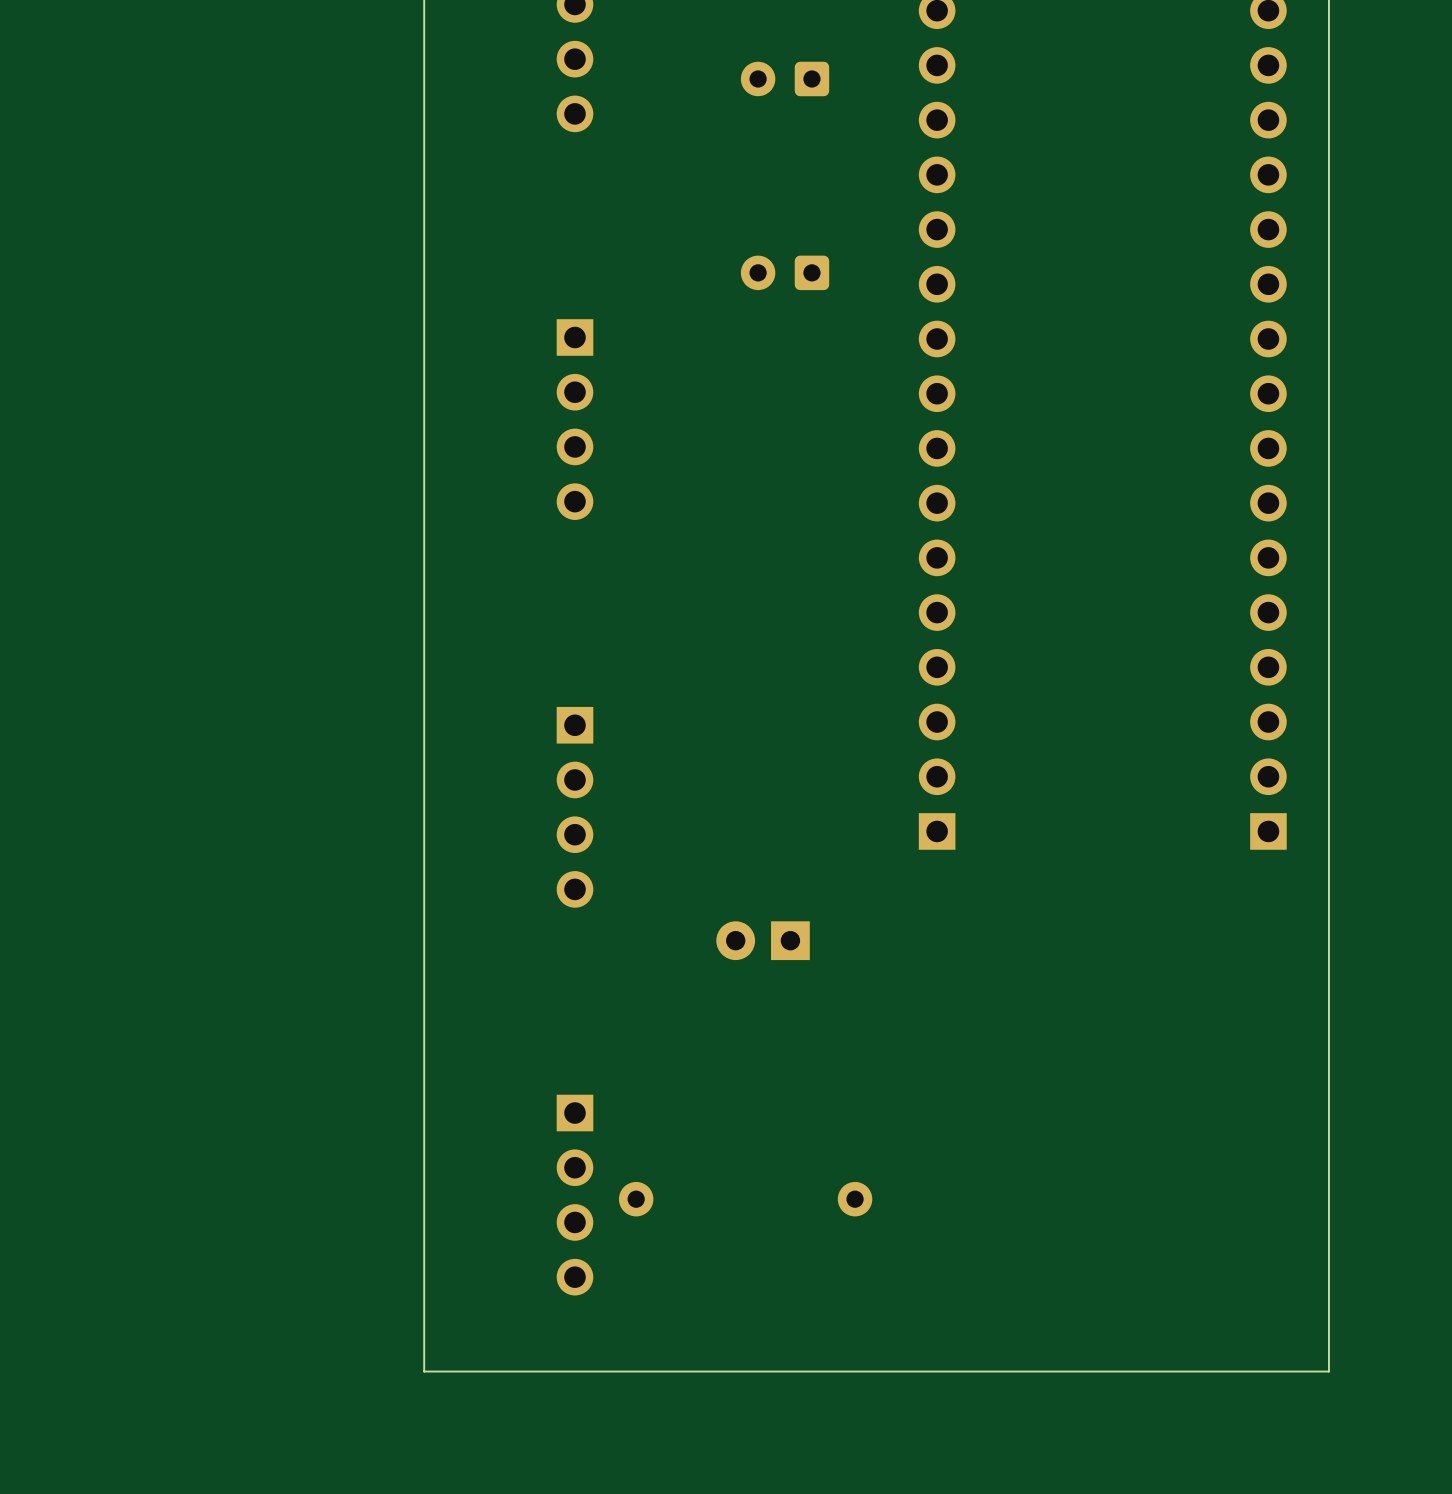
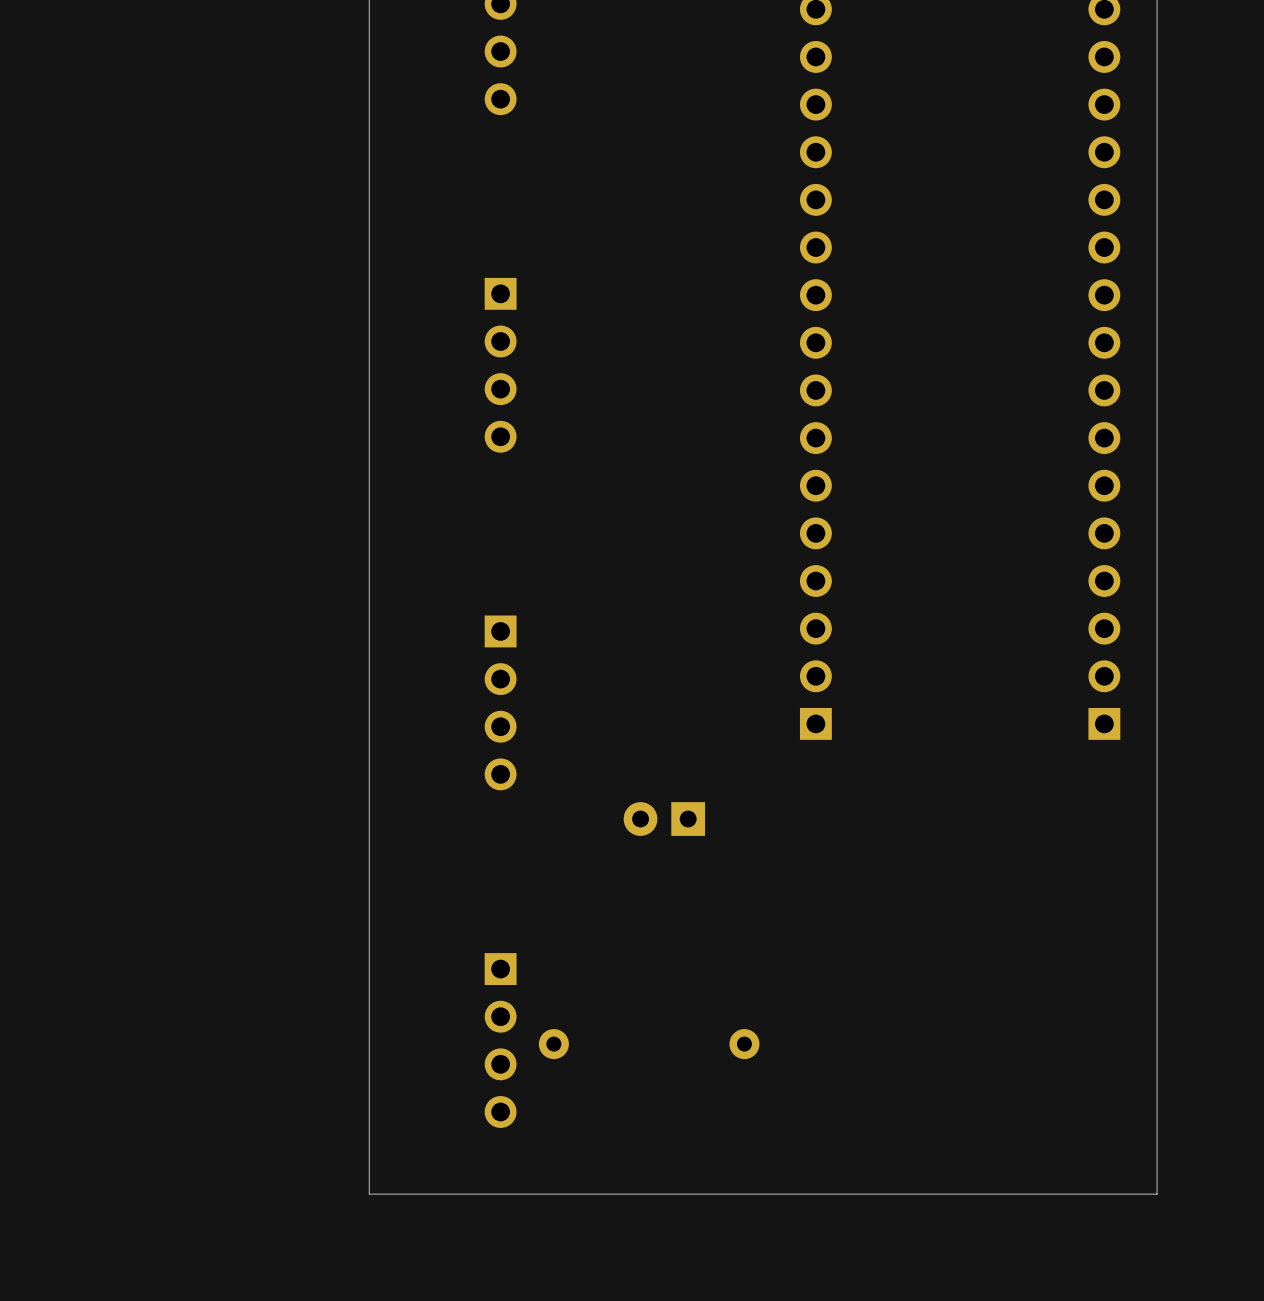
part: (785, 78) -> none
part: (785, 272) -> none

